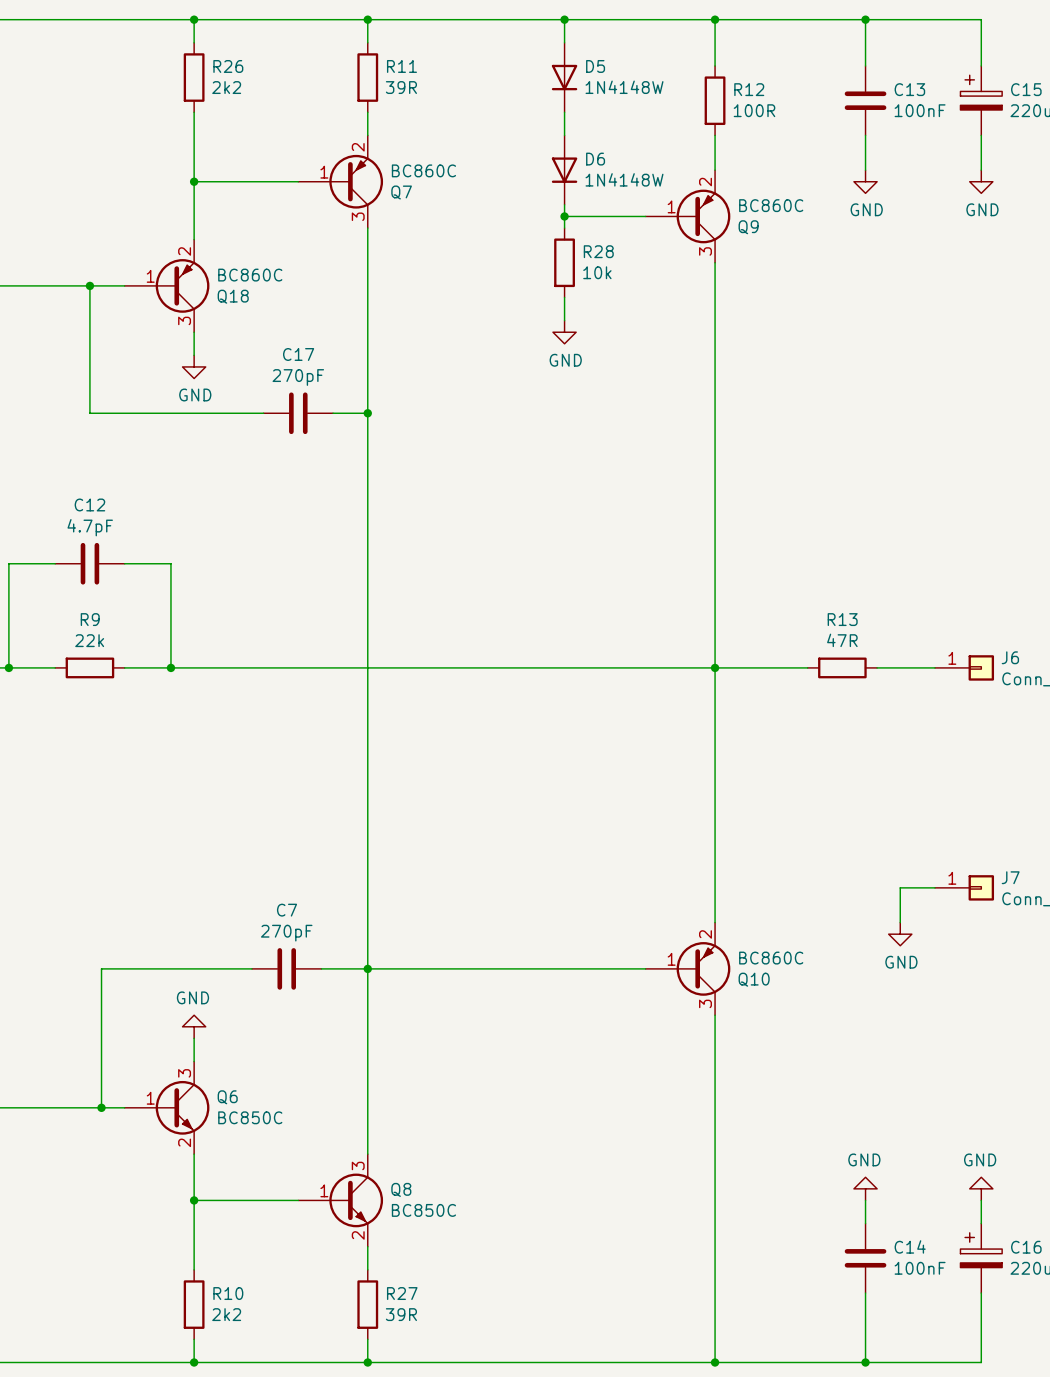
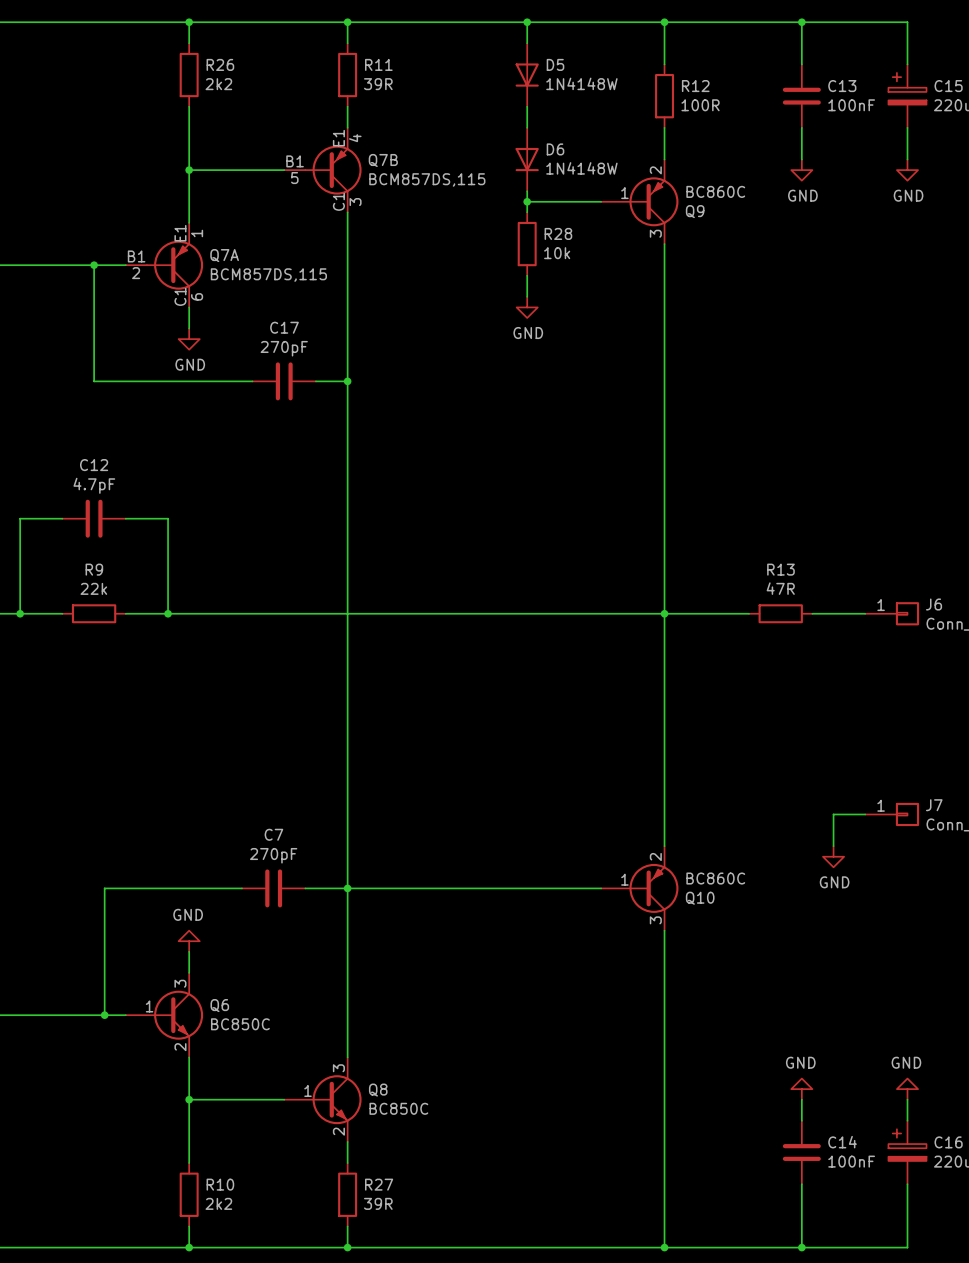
Q7: BC860C (340, 181) -> none
Q7B: none -> BCM857DS,115 (322, 170)
Q18: BC860C (167, 285) -> none
Q7A: none -> BCM857DS,115 (164, 265)

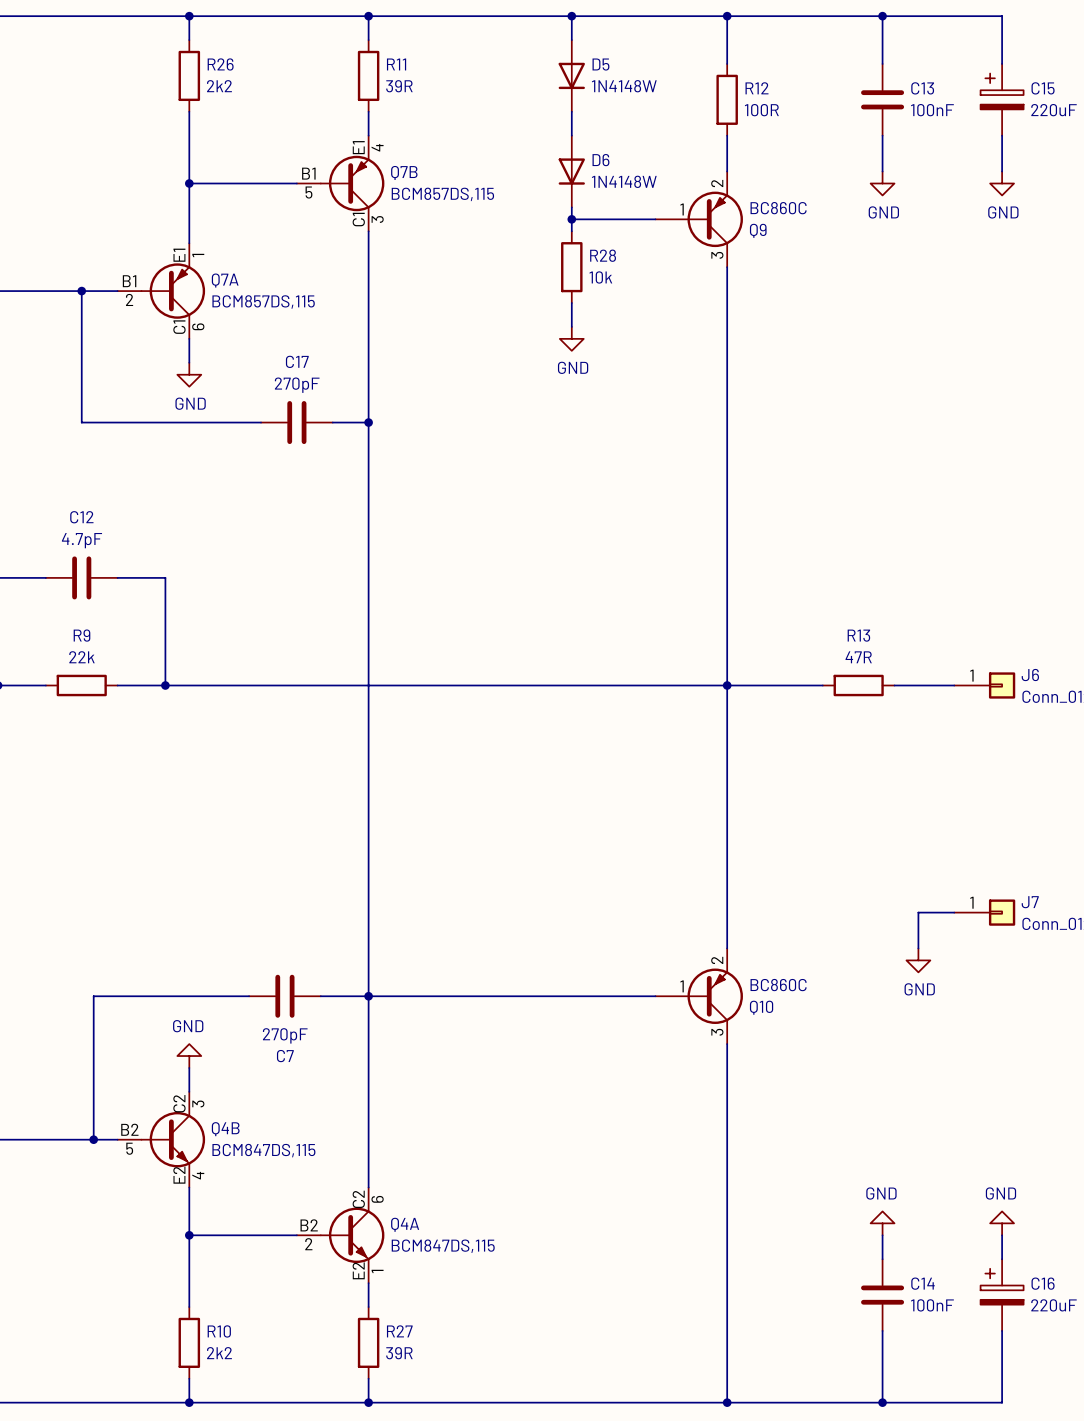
C7 name position: C7 (273, 834) -> C7 (285, 1056)
C7 value position: 270pF (273, 855) -> 270pF (285, 1035)
Q6: BC850C (164, 1015) -> none
Q4B: none -> BCM847DS,115 (161, 1139)
Q8: BC850C (322, 1099) -> none
Q4A: none -> BCM847DS,115 (340, 1235)

